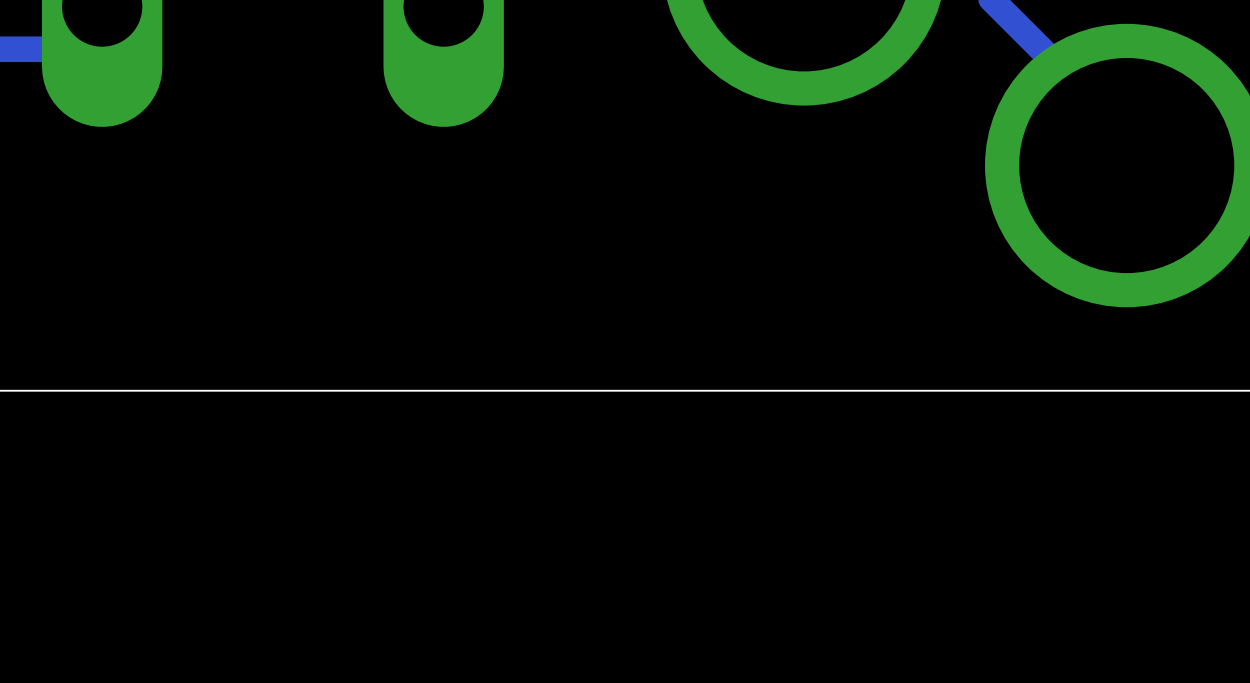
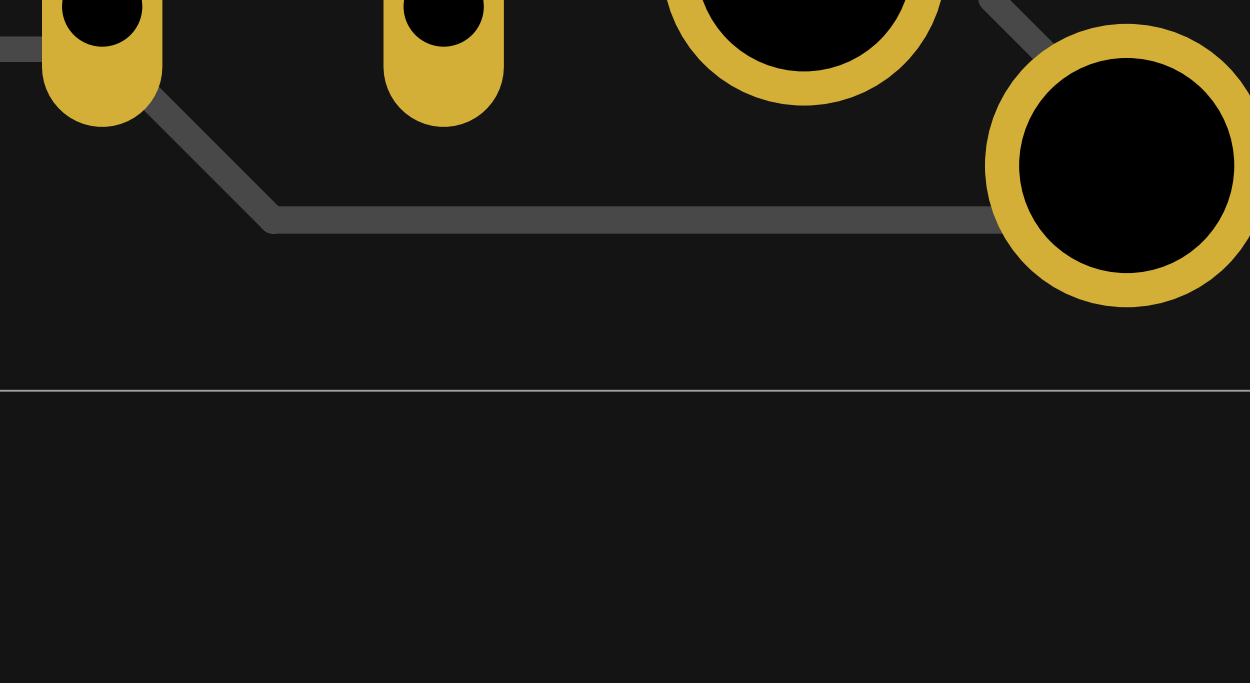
track: none -> (102, 49) (272, 219) (1126, 219) (1126, 165)

